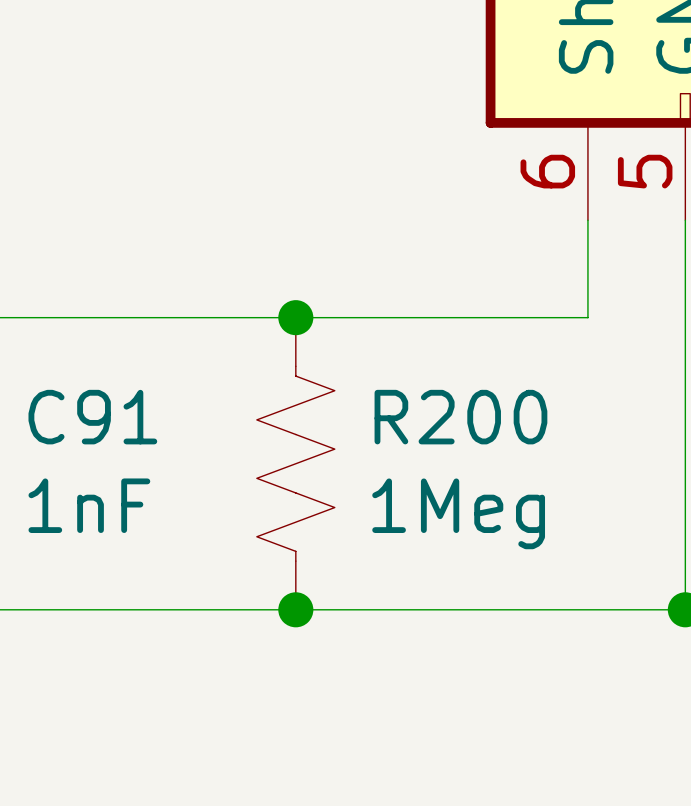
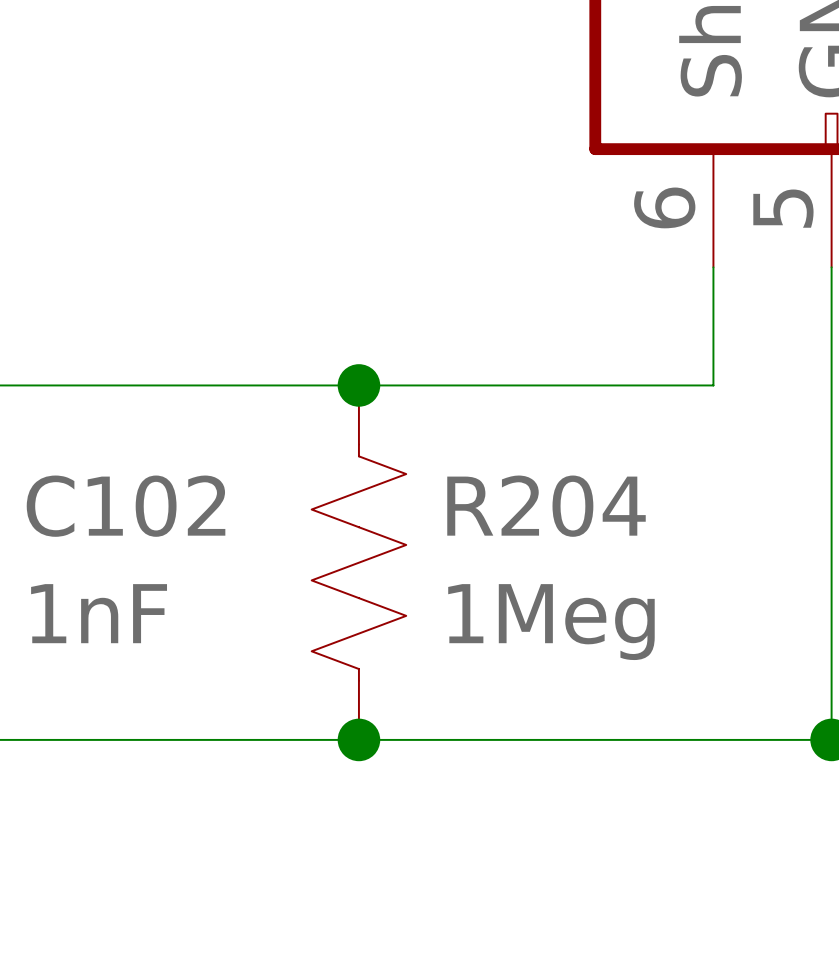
C91 name: C91 (92, 417) -> C102 (126, 506)
R200 name: R200 (460, 417) -> R204 (546, 506)

